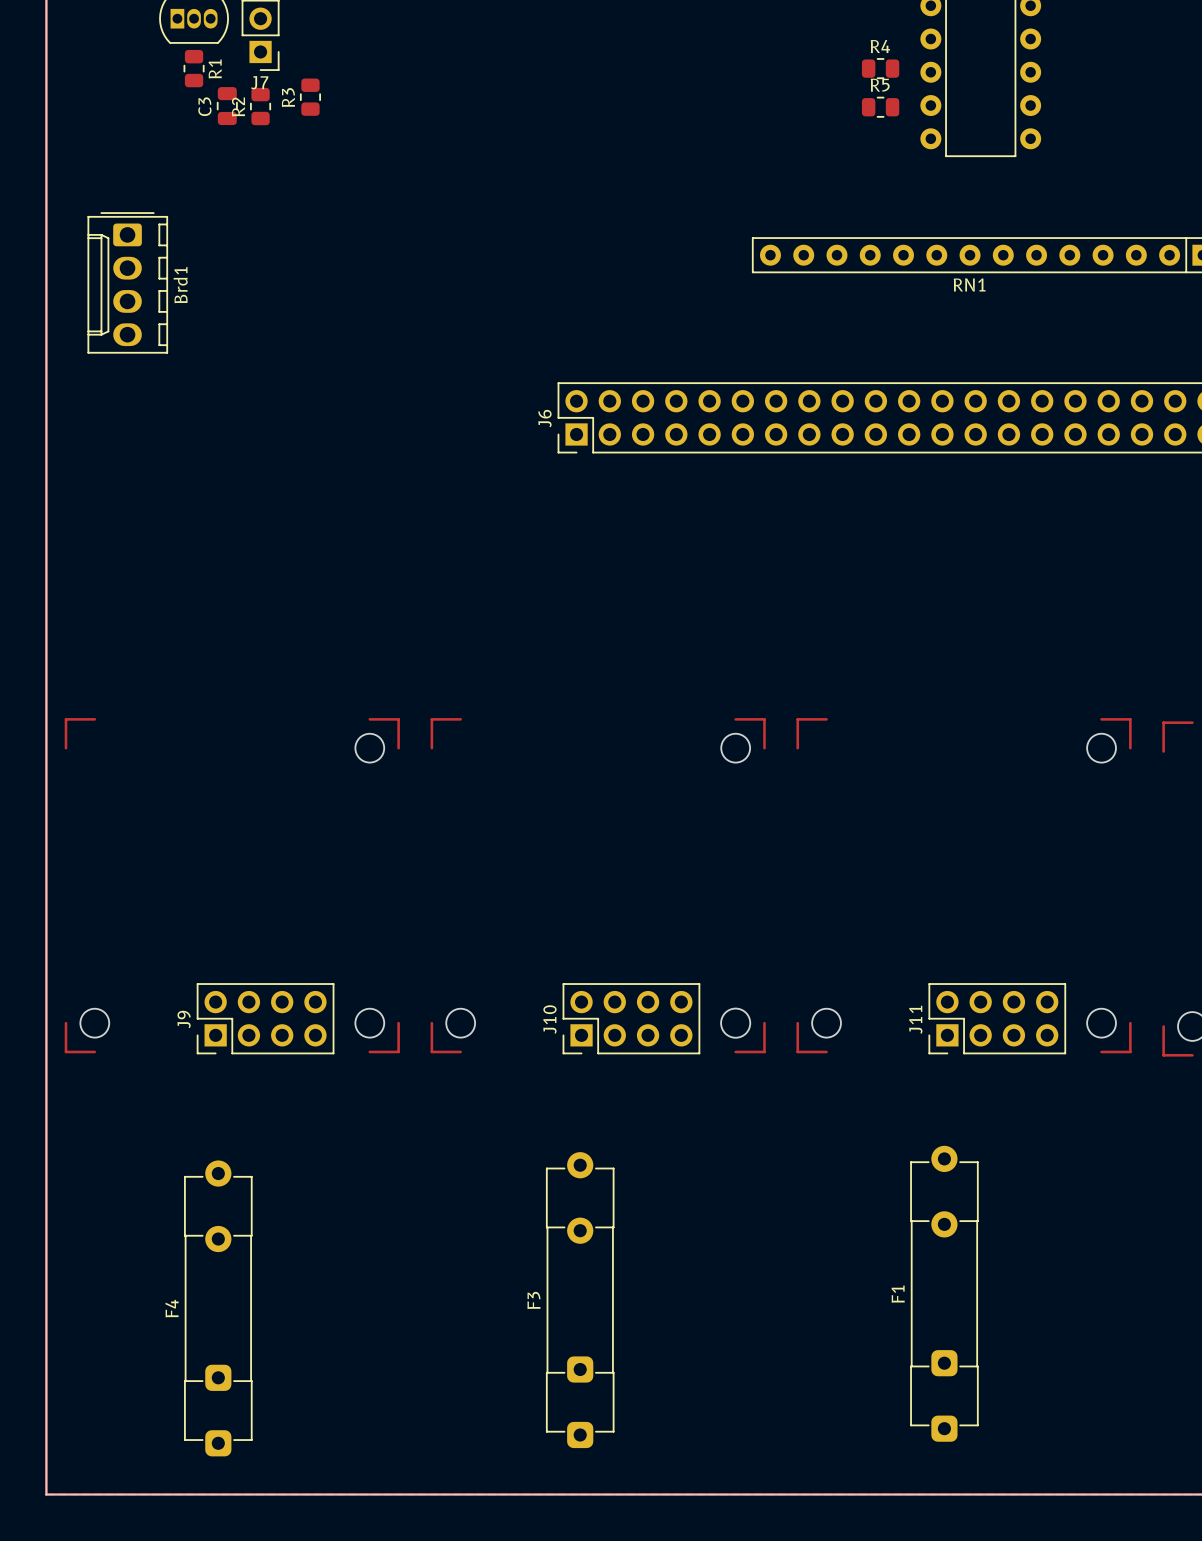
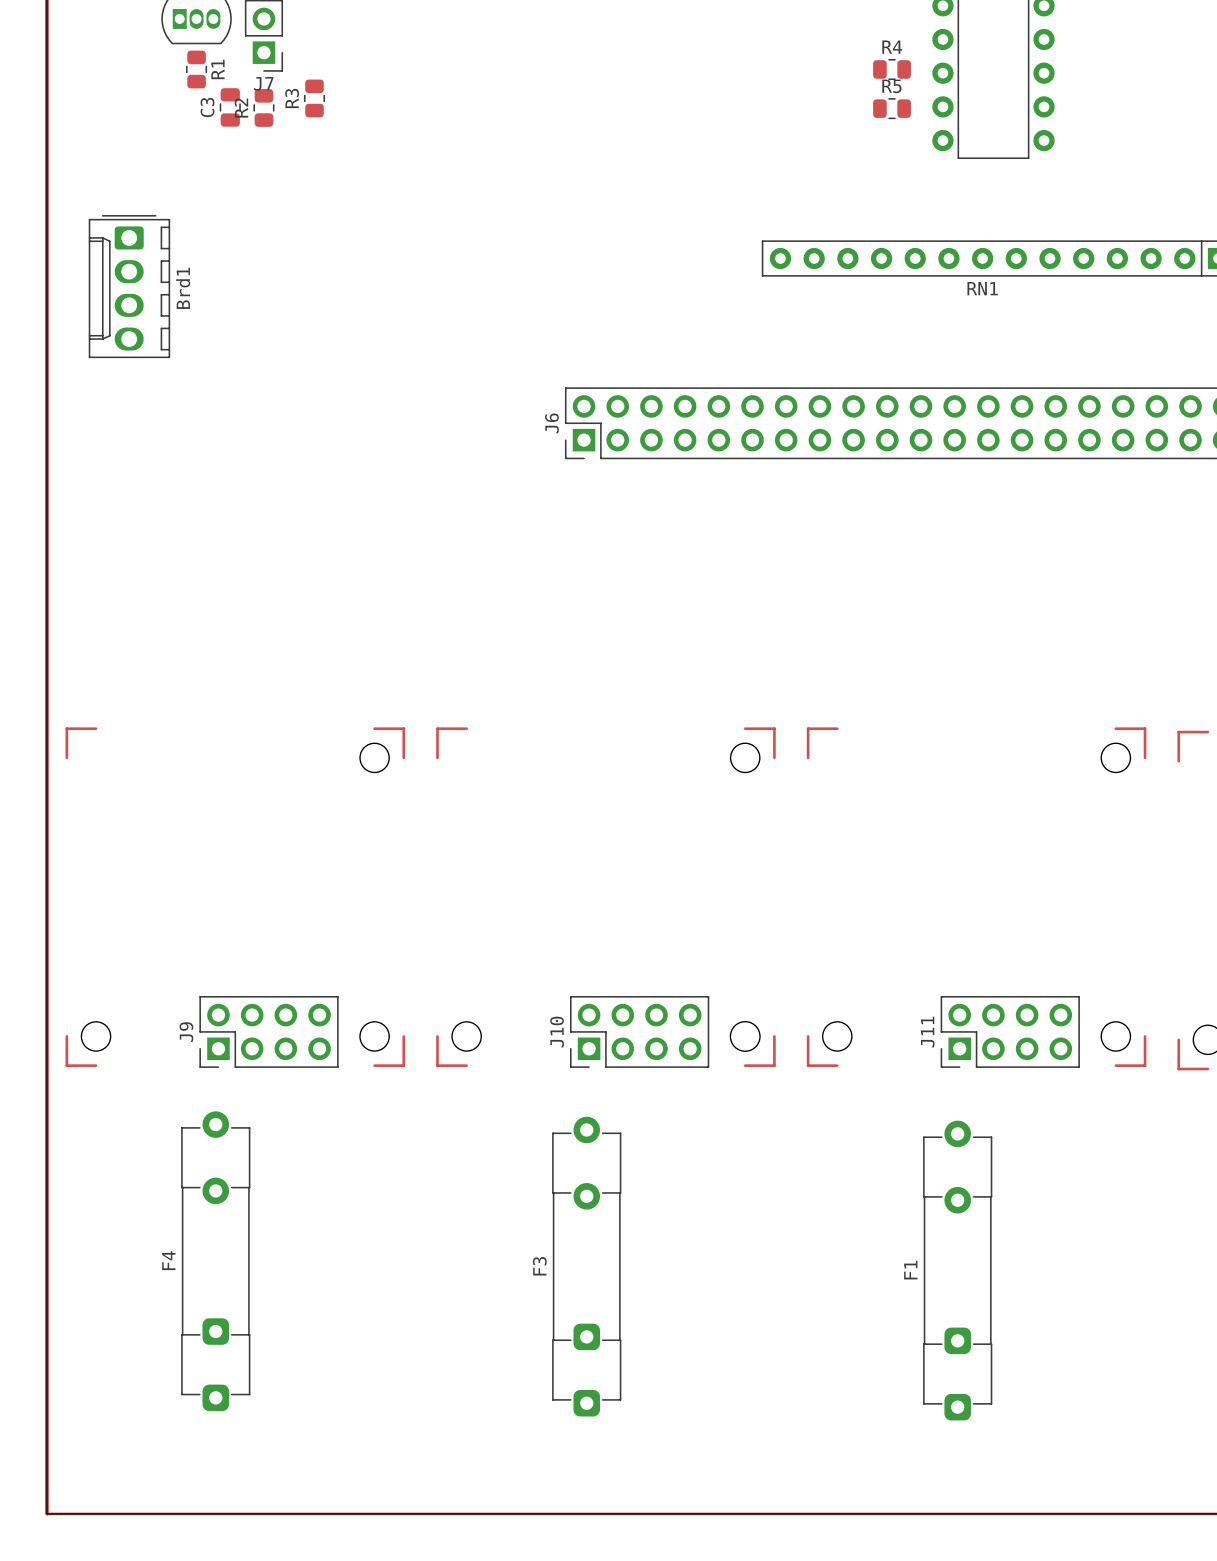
F1 position: (944, 1293) -> (957, 1270)
F3 position: (580, 1300) -> (586, 1266)
F4 position: (218, 1308) -> (215, 1261)

